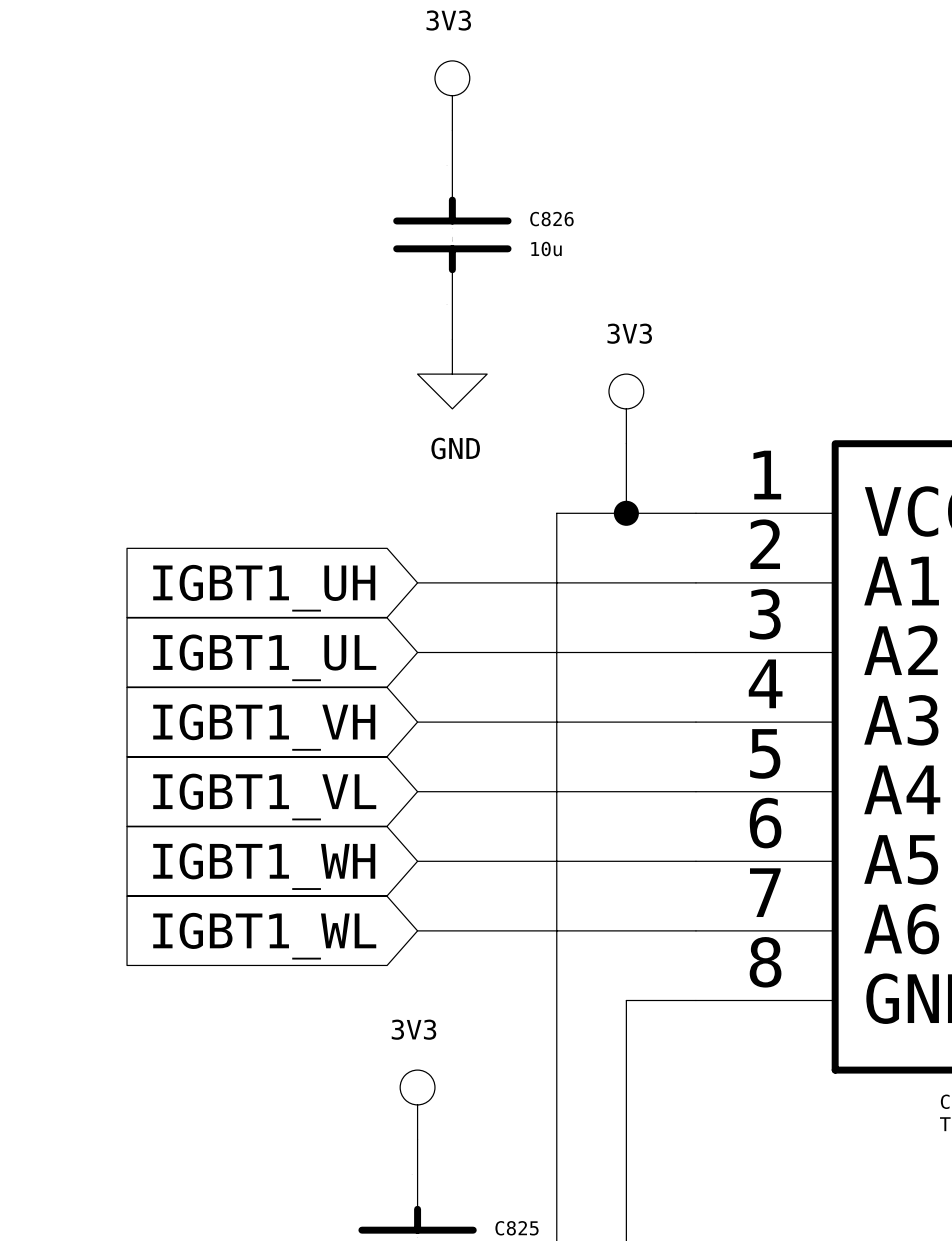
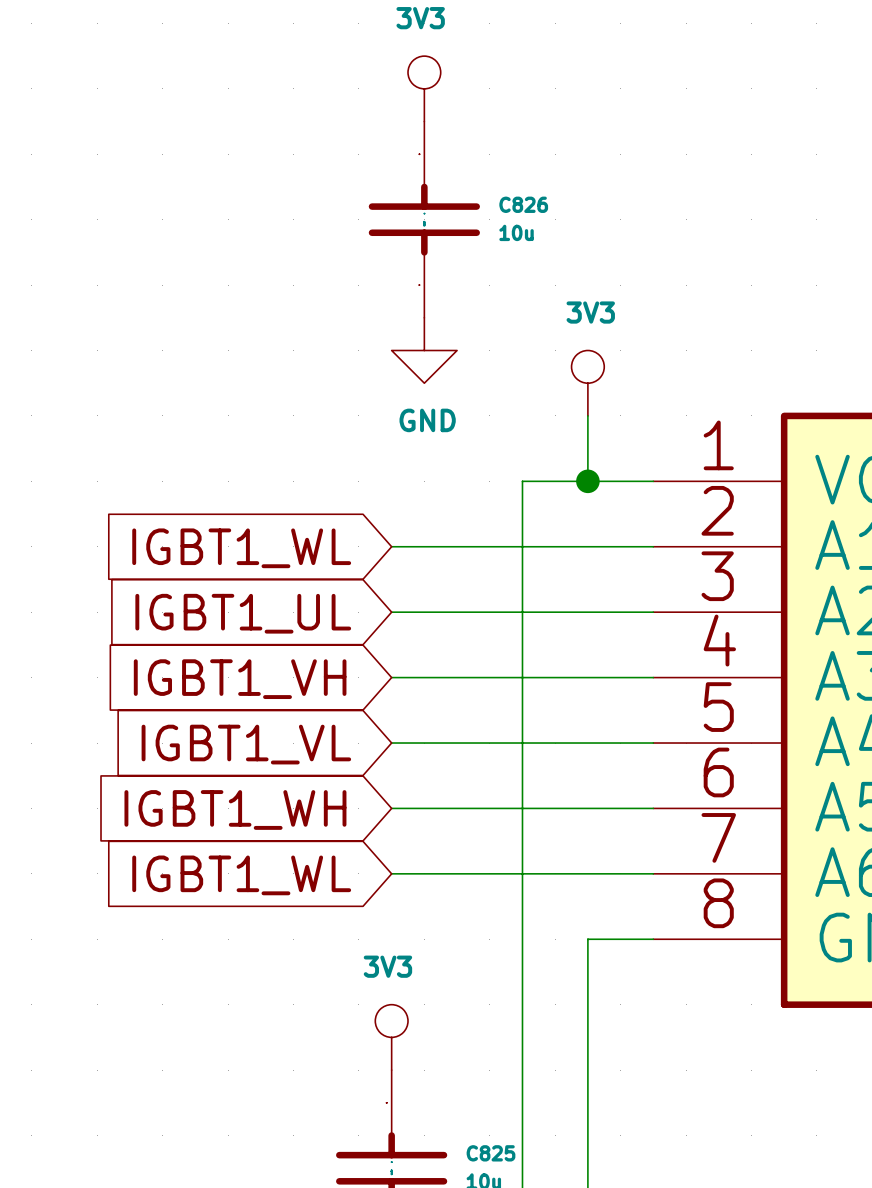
global label: IGBT1_UH (264, 588) -> IGBT1_WL (241, 548)

